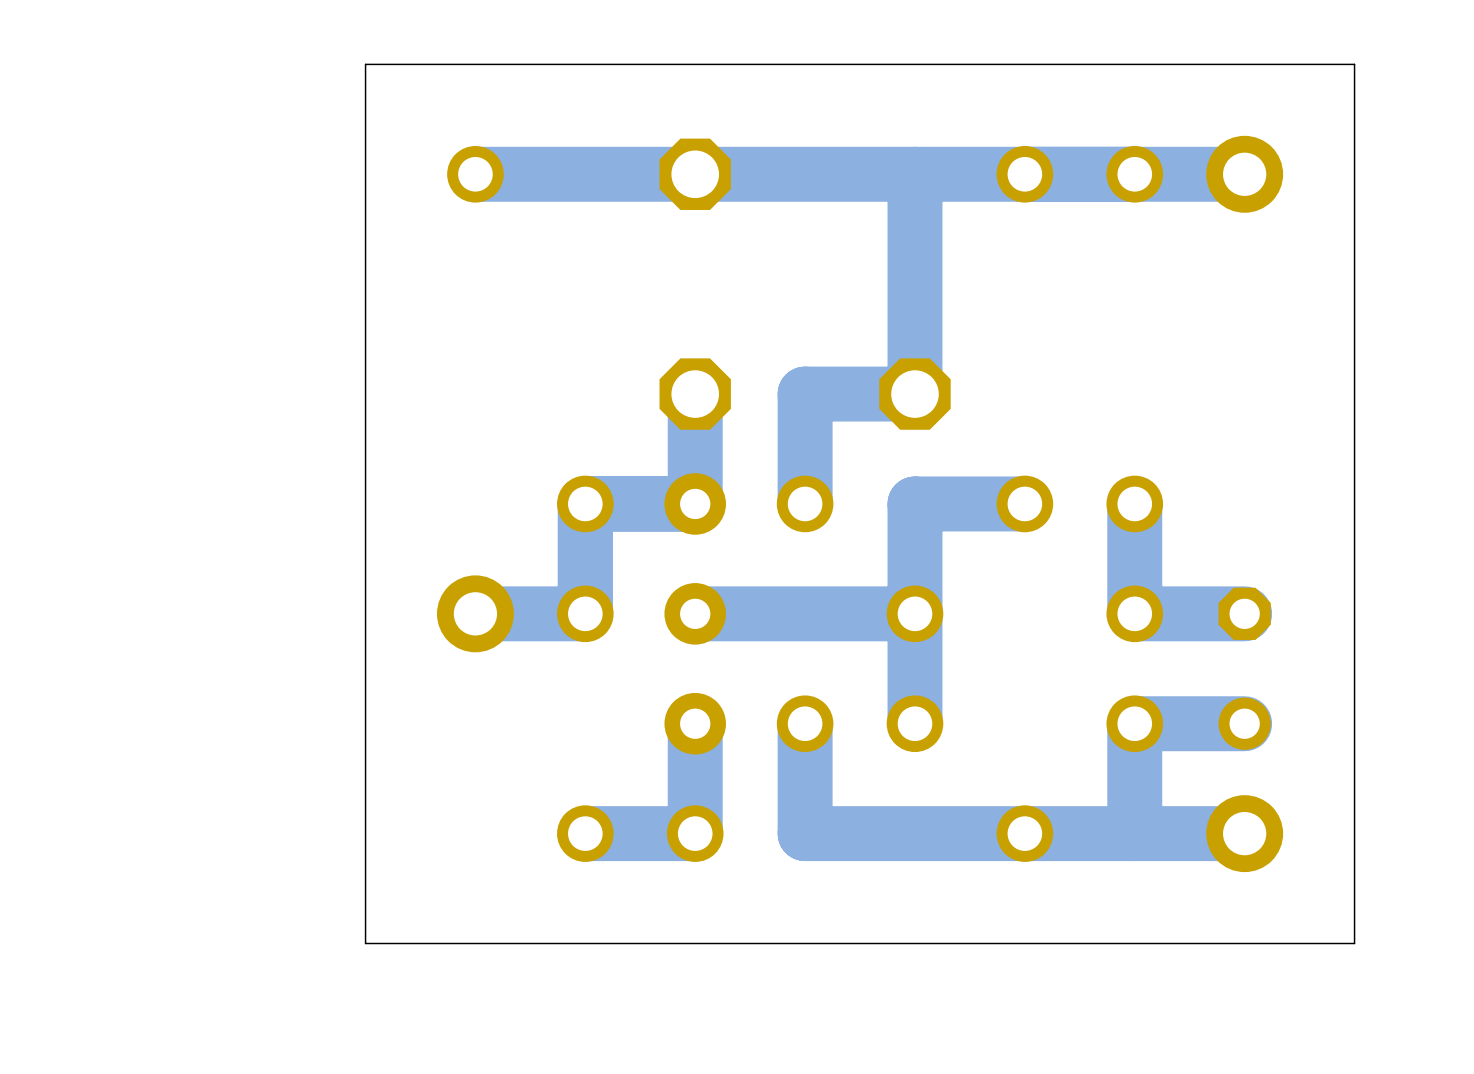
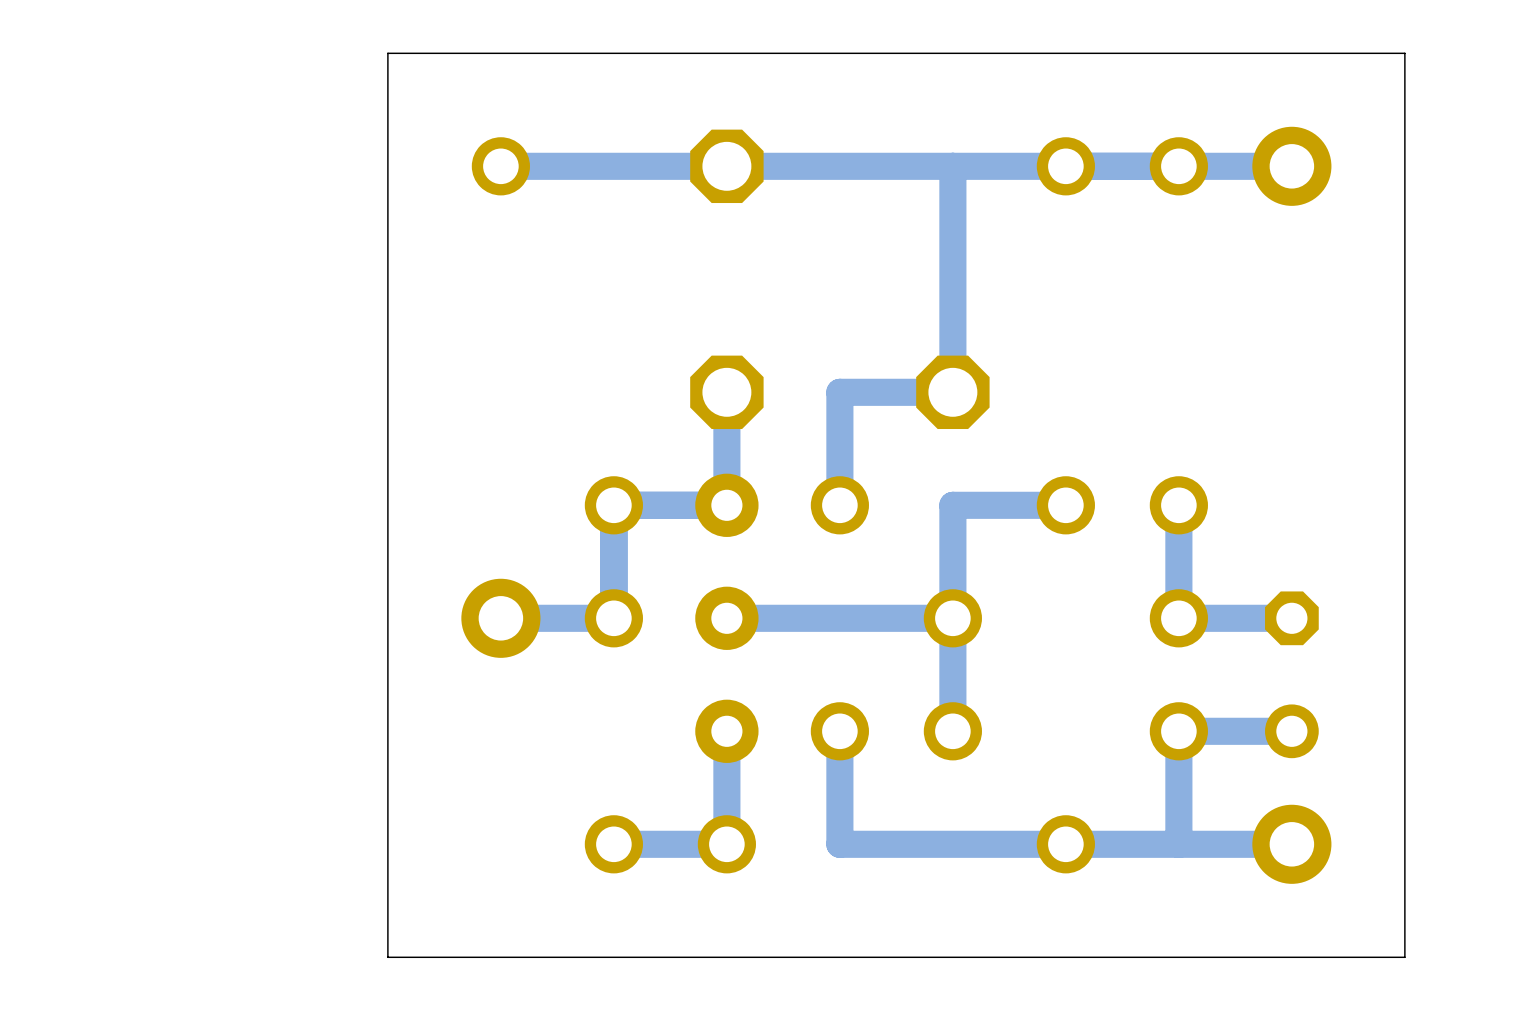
bottom track width: thick (914, 174) (914, 394) (805, 394) (805, 503) -> thin (952, 166) (952, 392) (839, 392) (839, 505)
bottom track width: thick (1244, 174) (475, 174) -> thin (1291, 166) (500, 166)
bottom track width: thick (695, 394) (695, 503) (585, 503) (585, 613) (475, 613) -> thin (726, 392) (726, 505) (613, 505) (613, 618) (500, 618)
bottom track width: thick (1024, 503) (914, 503) (914, 723) -> thin (1065, 505) (952, 505) (952, 731)
bottom track width: thick (1134, 503) (1134, 613) (1244, 613) -> thin (1178, 505) (1178, 618) (1291, 618)
bottom track width: thick (914, 613) (695, 613) -> thin (952, 618) (726, 618)
bottom track width: thick (695, 723) (695, 833) (585, 833) -> thin (726, 731) (726, 844) (613, 844)
bottom track width: thick (805, 723) (805, 833) (1244, 833) -> thin (839, 731) (839, 844) (1291, 844)
bottom track width: thick (1244, 723) (1134, 723) (1134, 833) -> thin (1291, 731) (1178, 731) (1178, 844)

